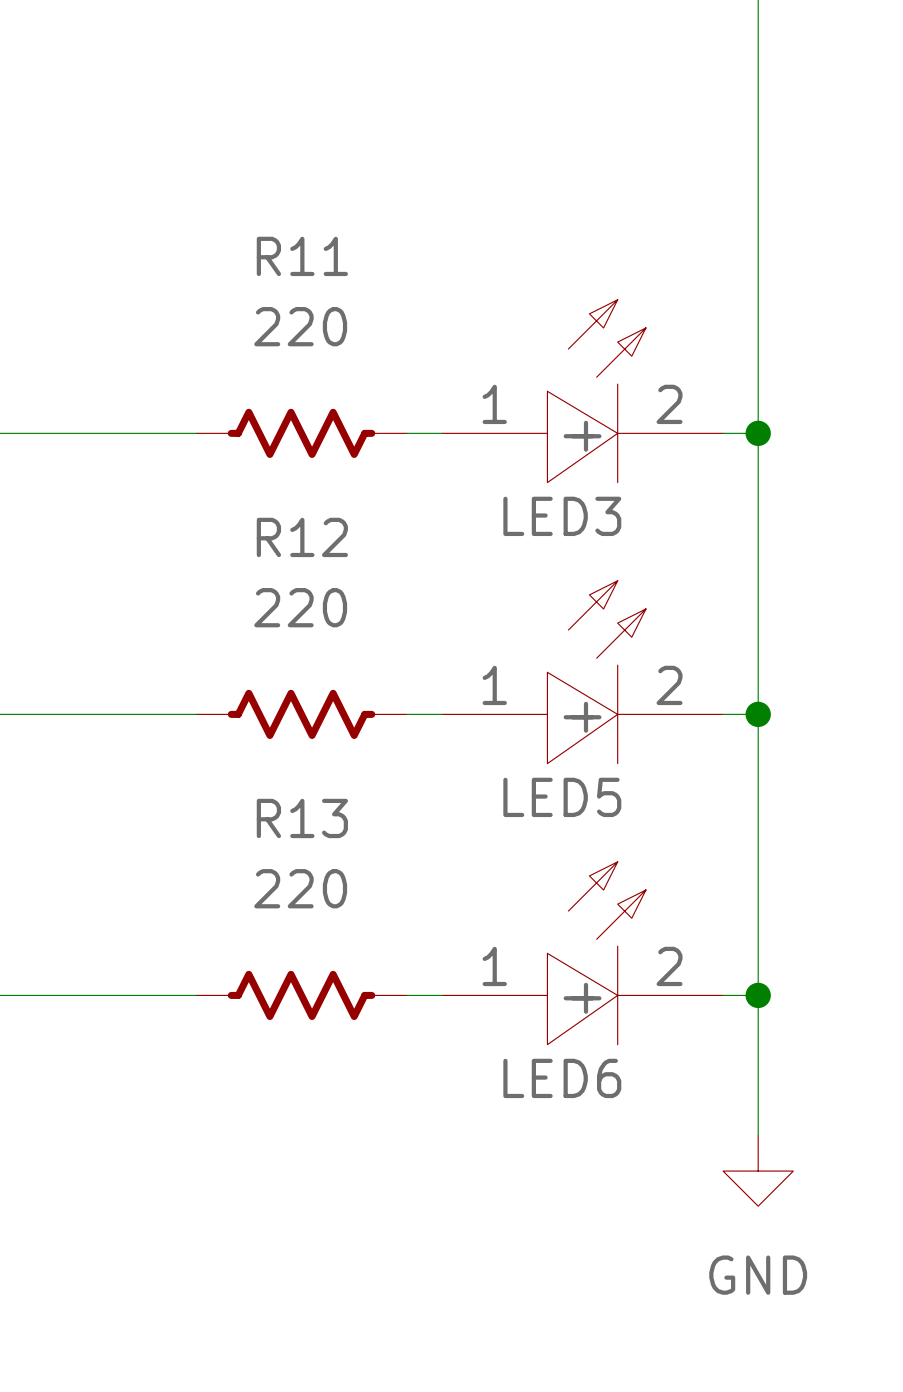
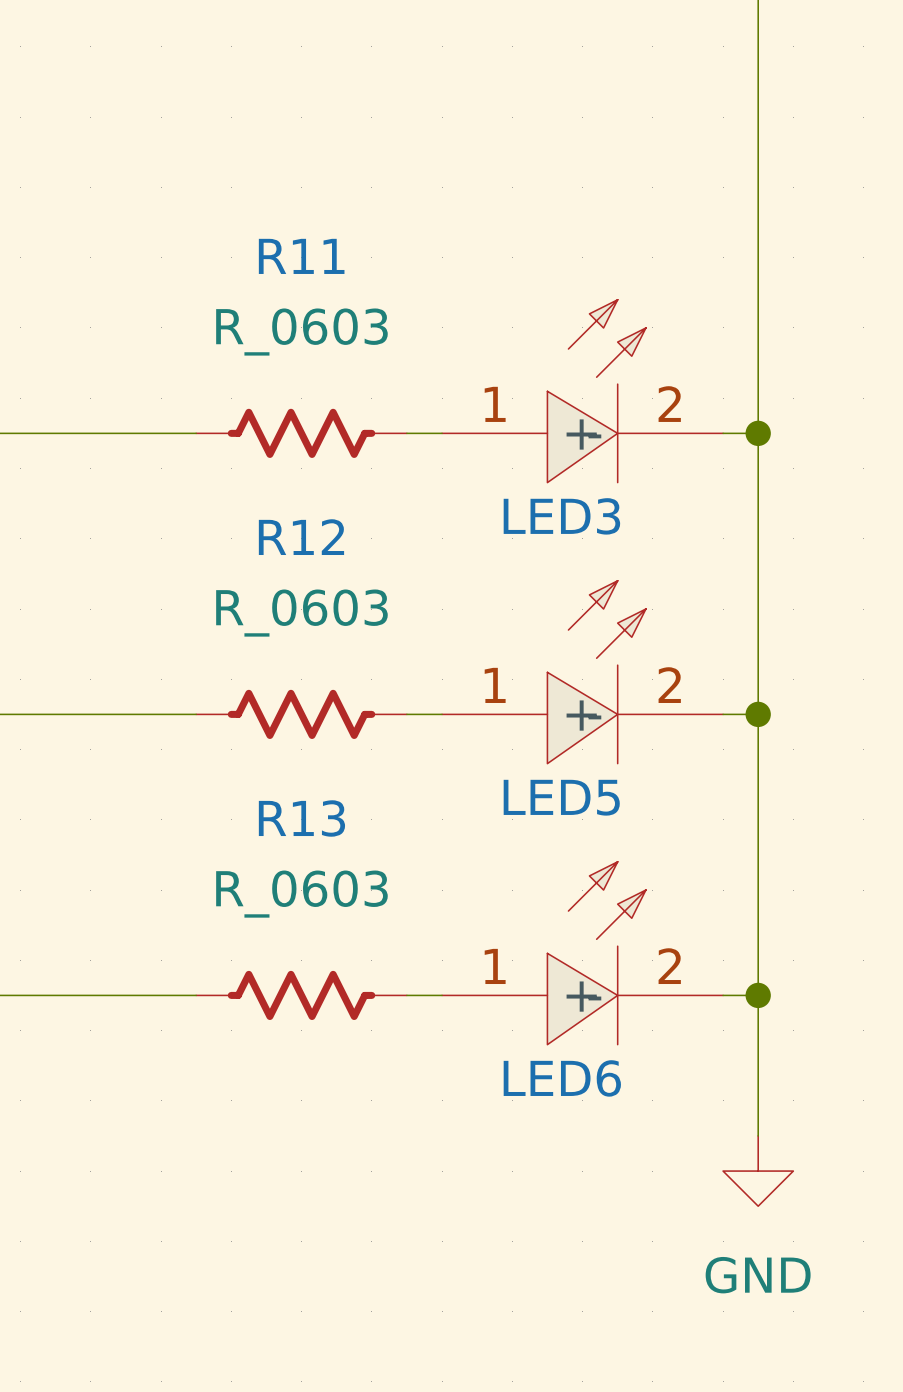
R11 value: 220 (300, 326) -> R_0603 (301, 332)
R12 value: 220 (300, 607) -> R_0603 (301, 613)
R13 value: 220 (300, 888) -> R_0603 (301, 894)

